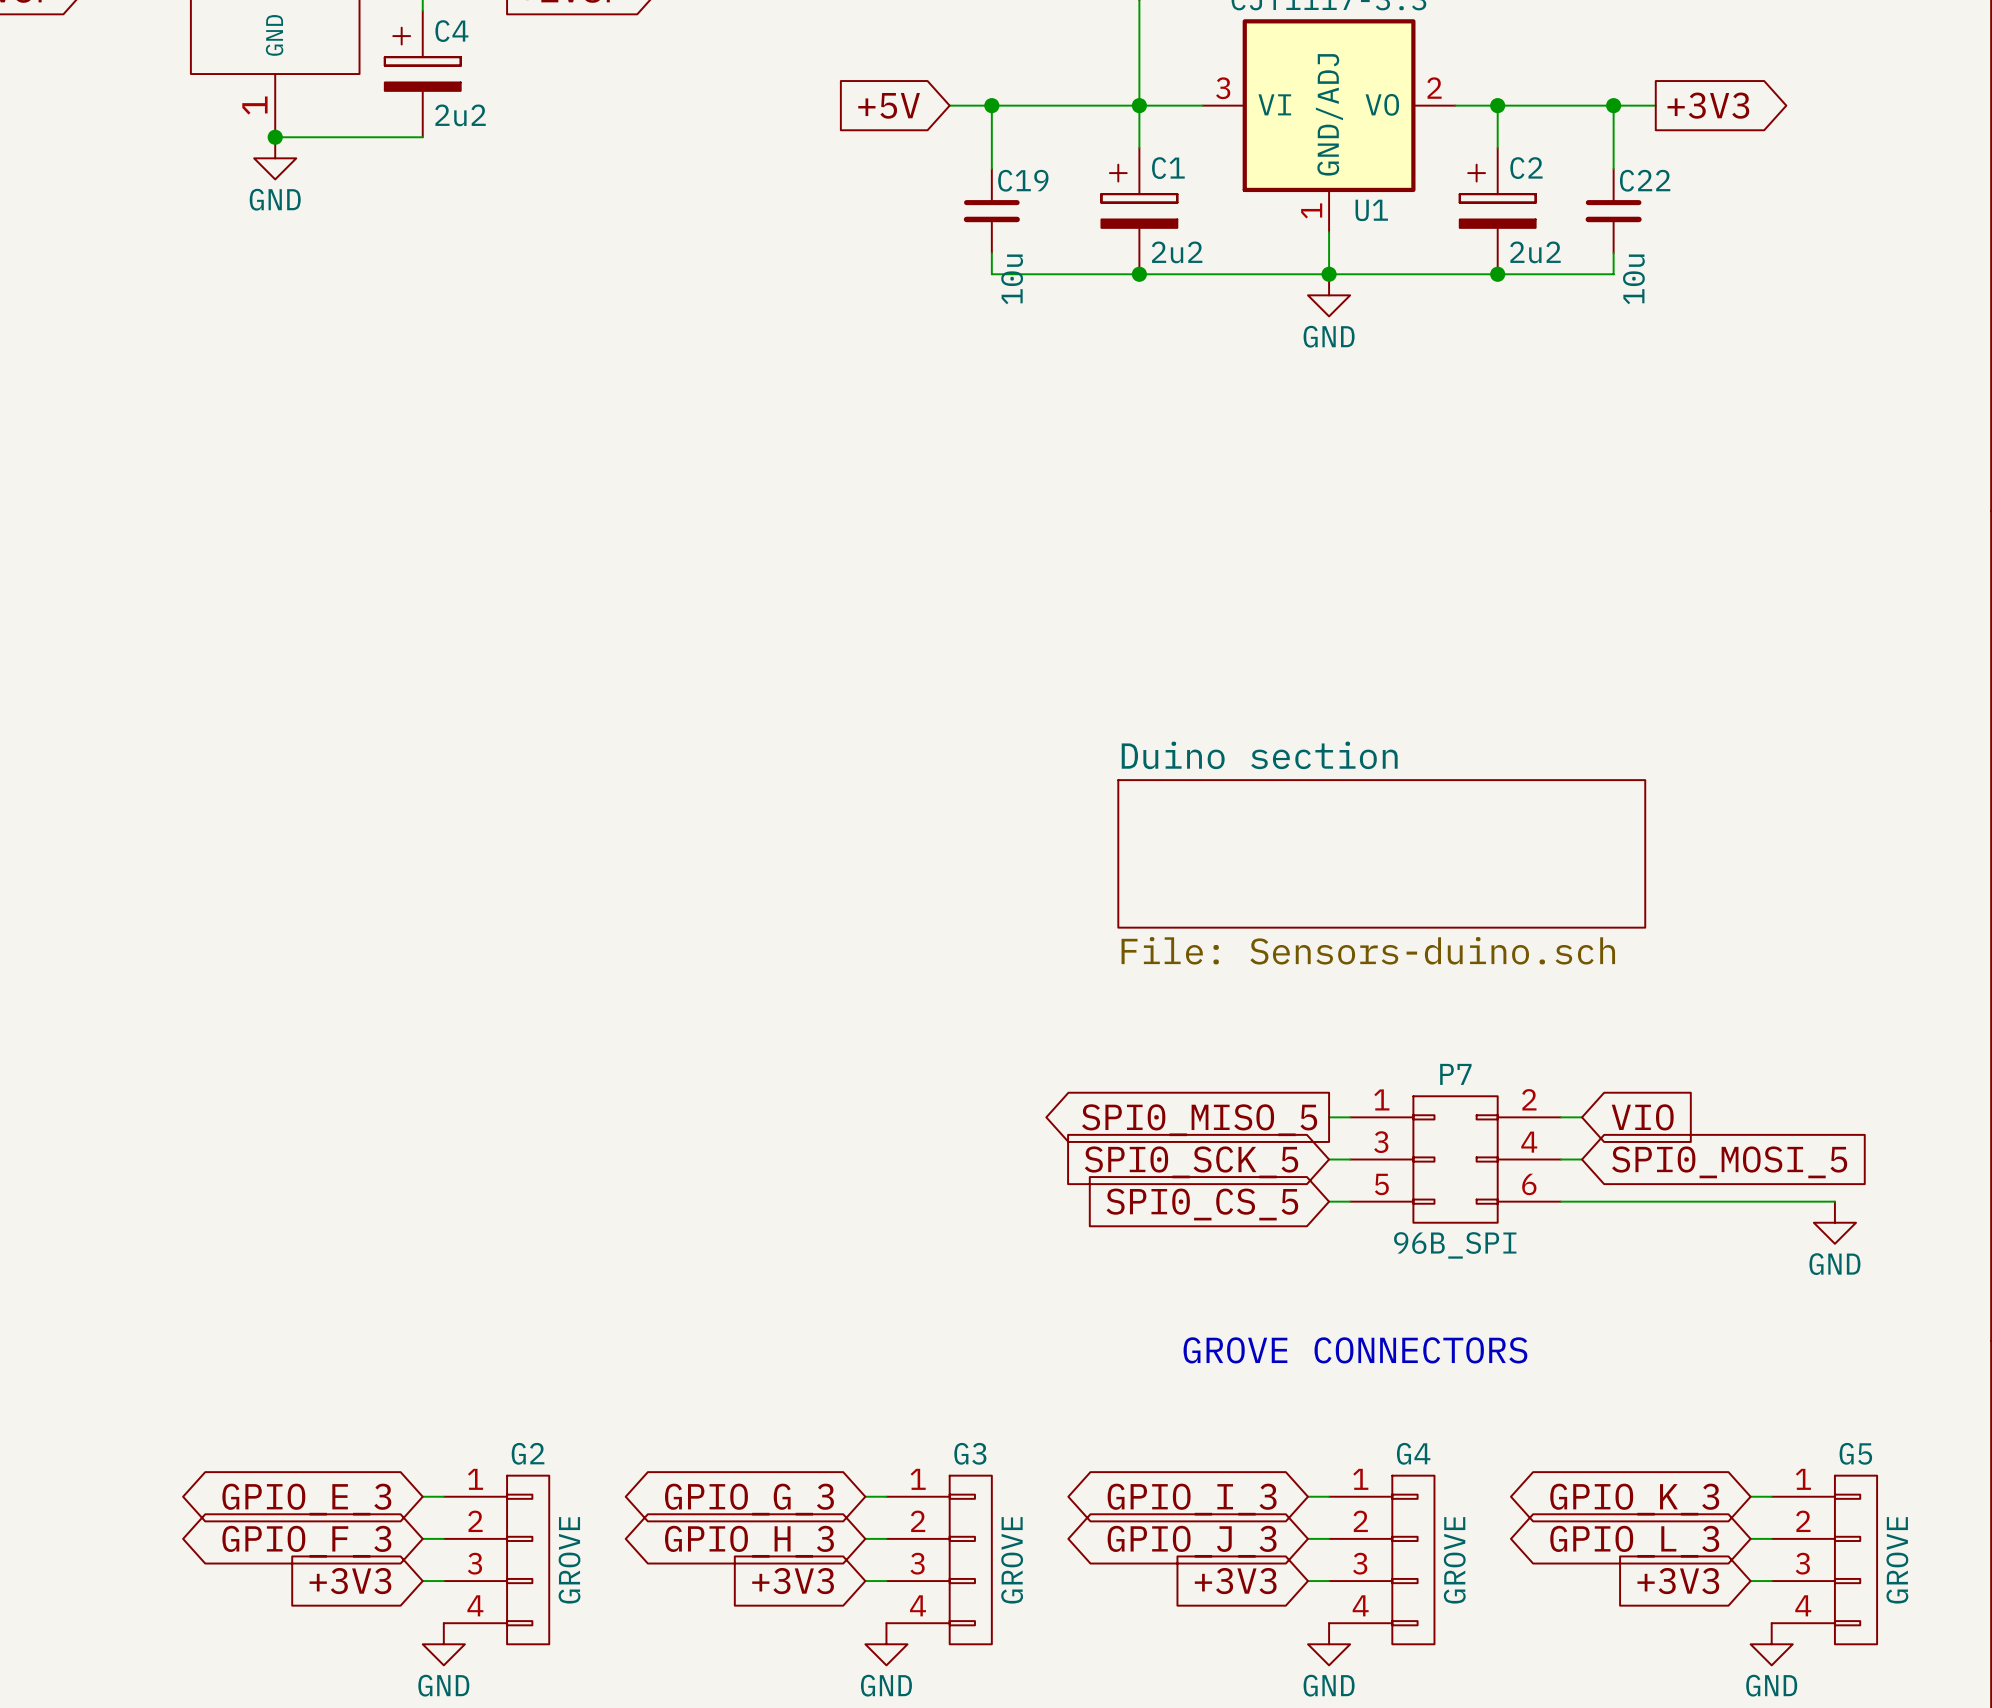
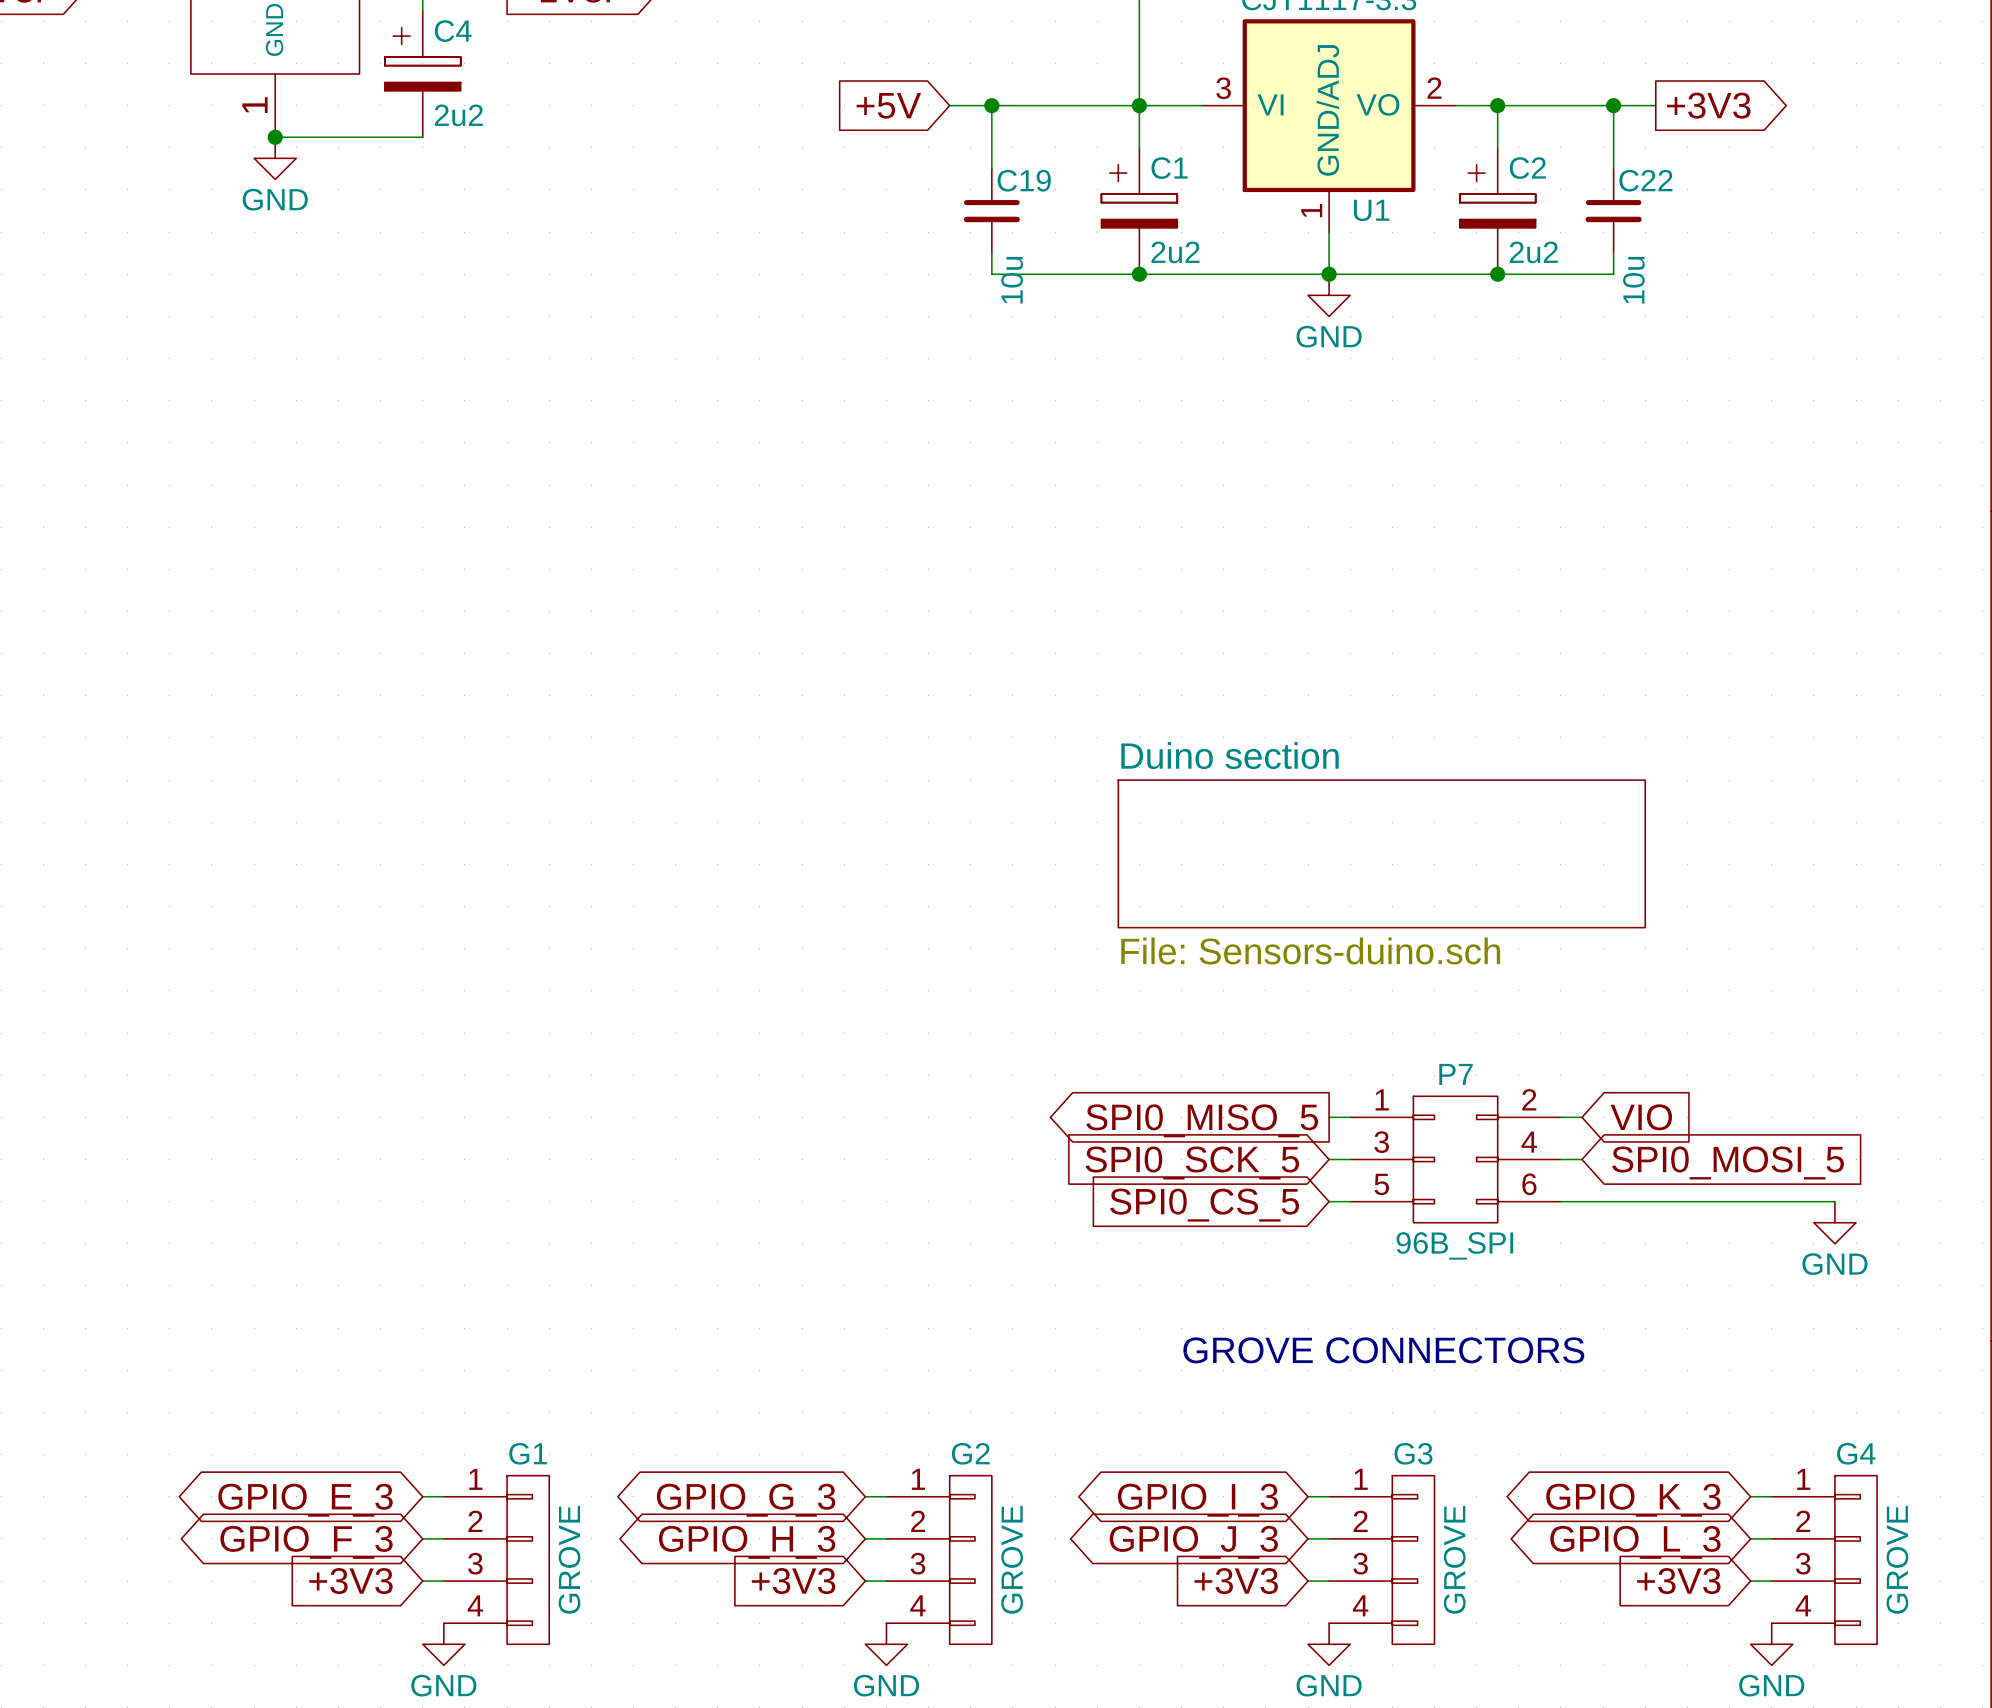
G2 name: G2 (528, 1453) -> G1 (528, 1453)
G3 name: G3 (970, 1453) -> G2 (970, 1453)
G4 name: G4 (1413, 1453) -> G3 (1413, 1453)
G5 name: G5 (1855, 1453) -> G4 (1856, 1453)

